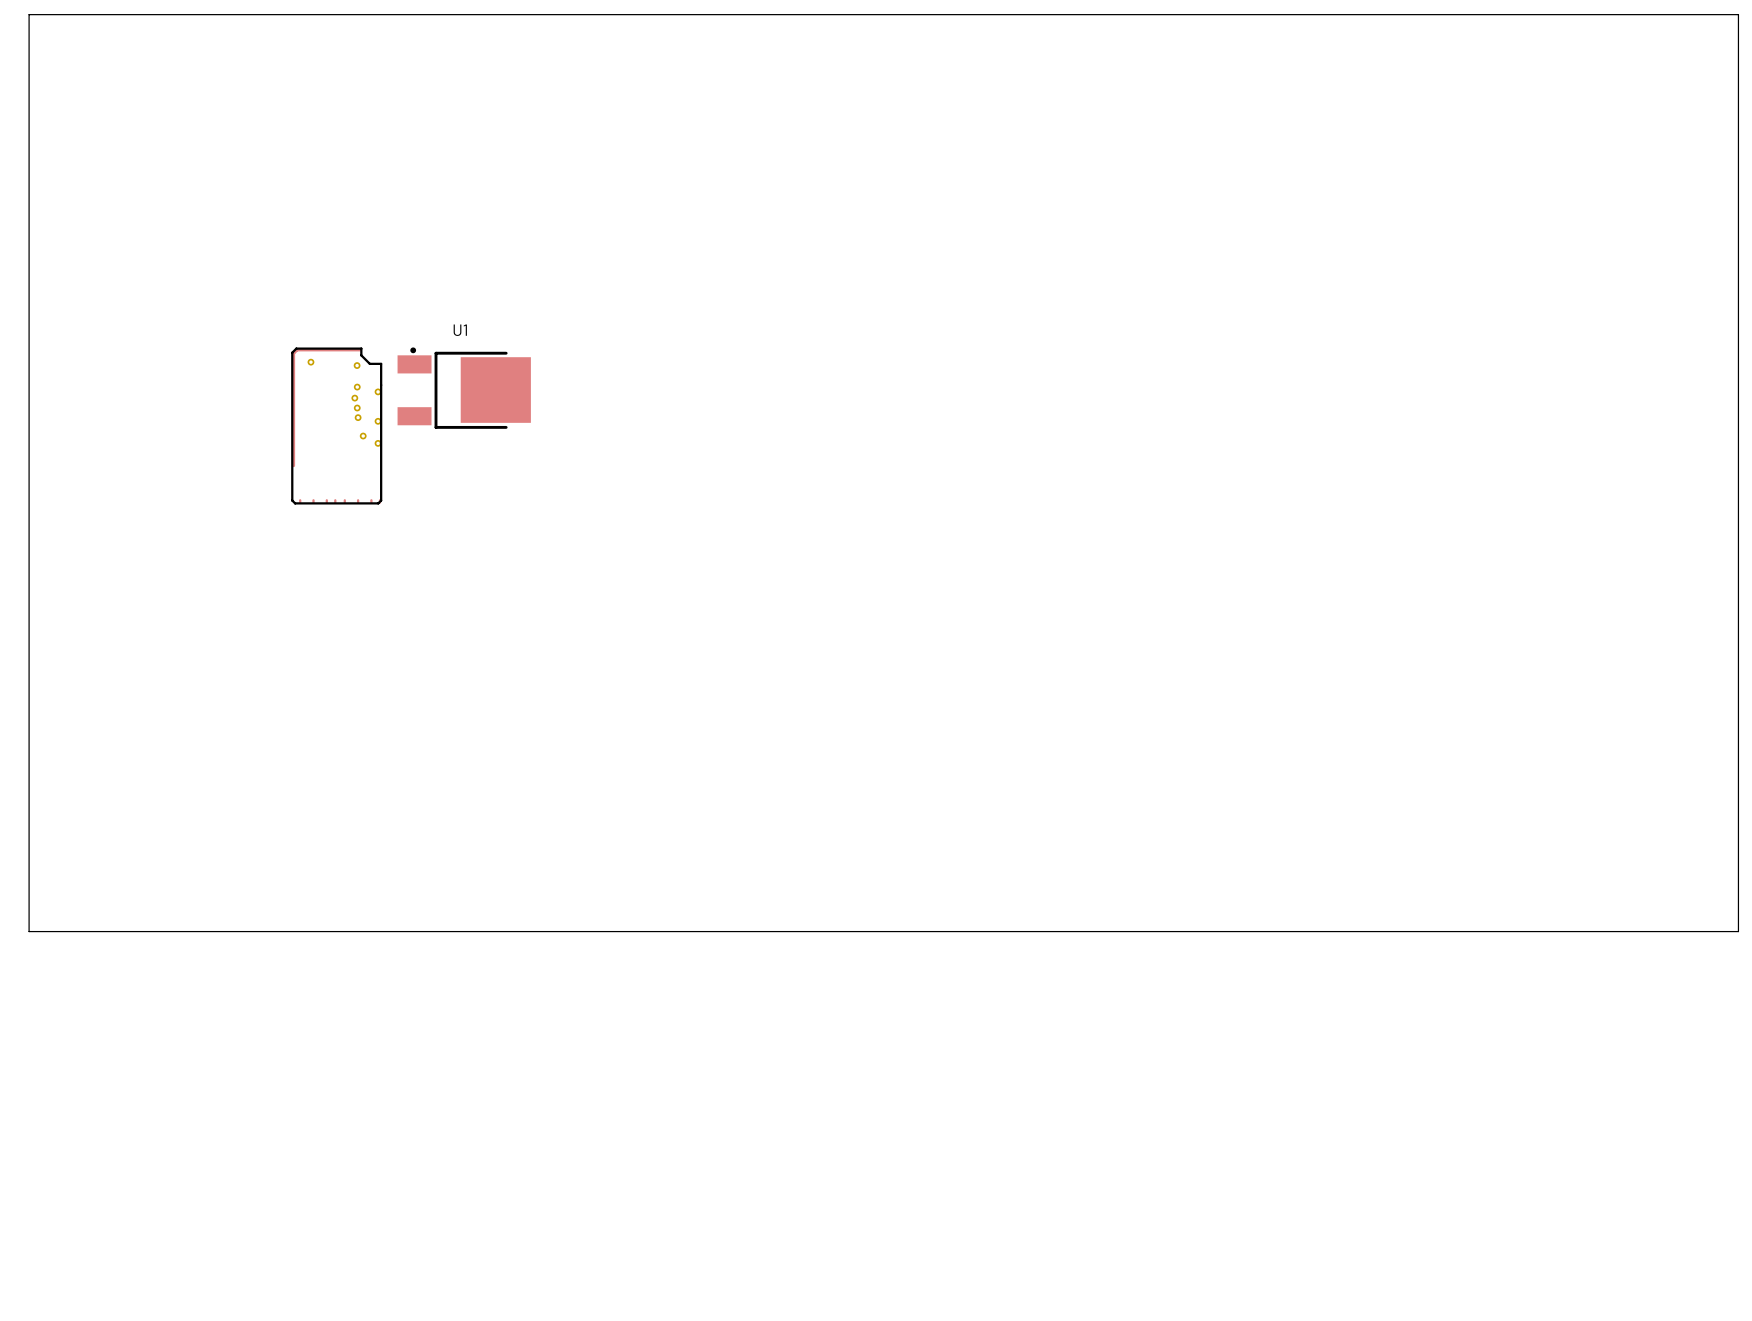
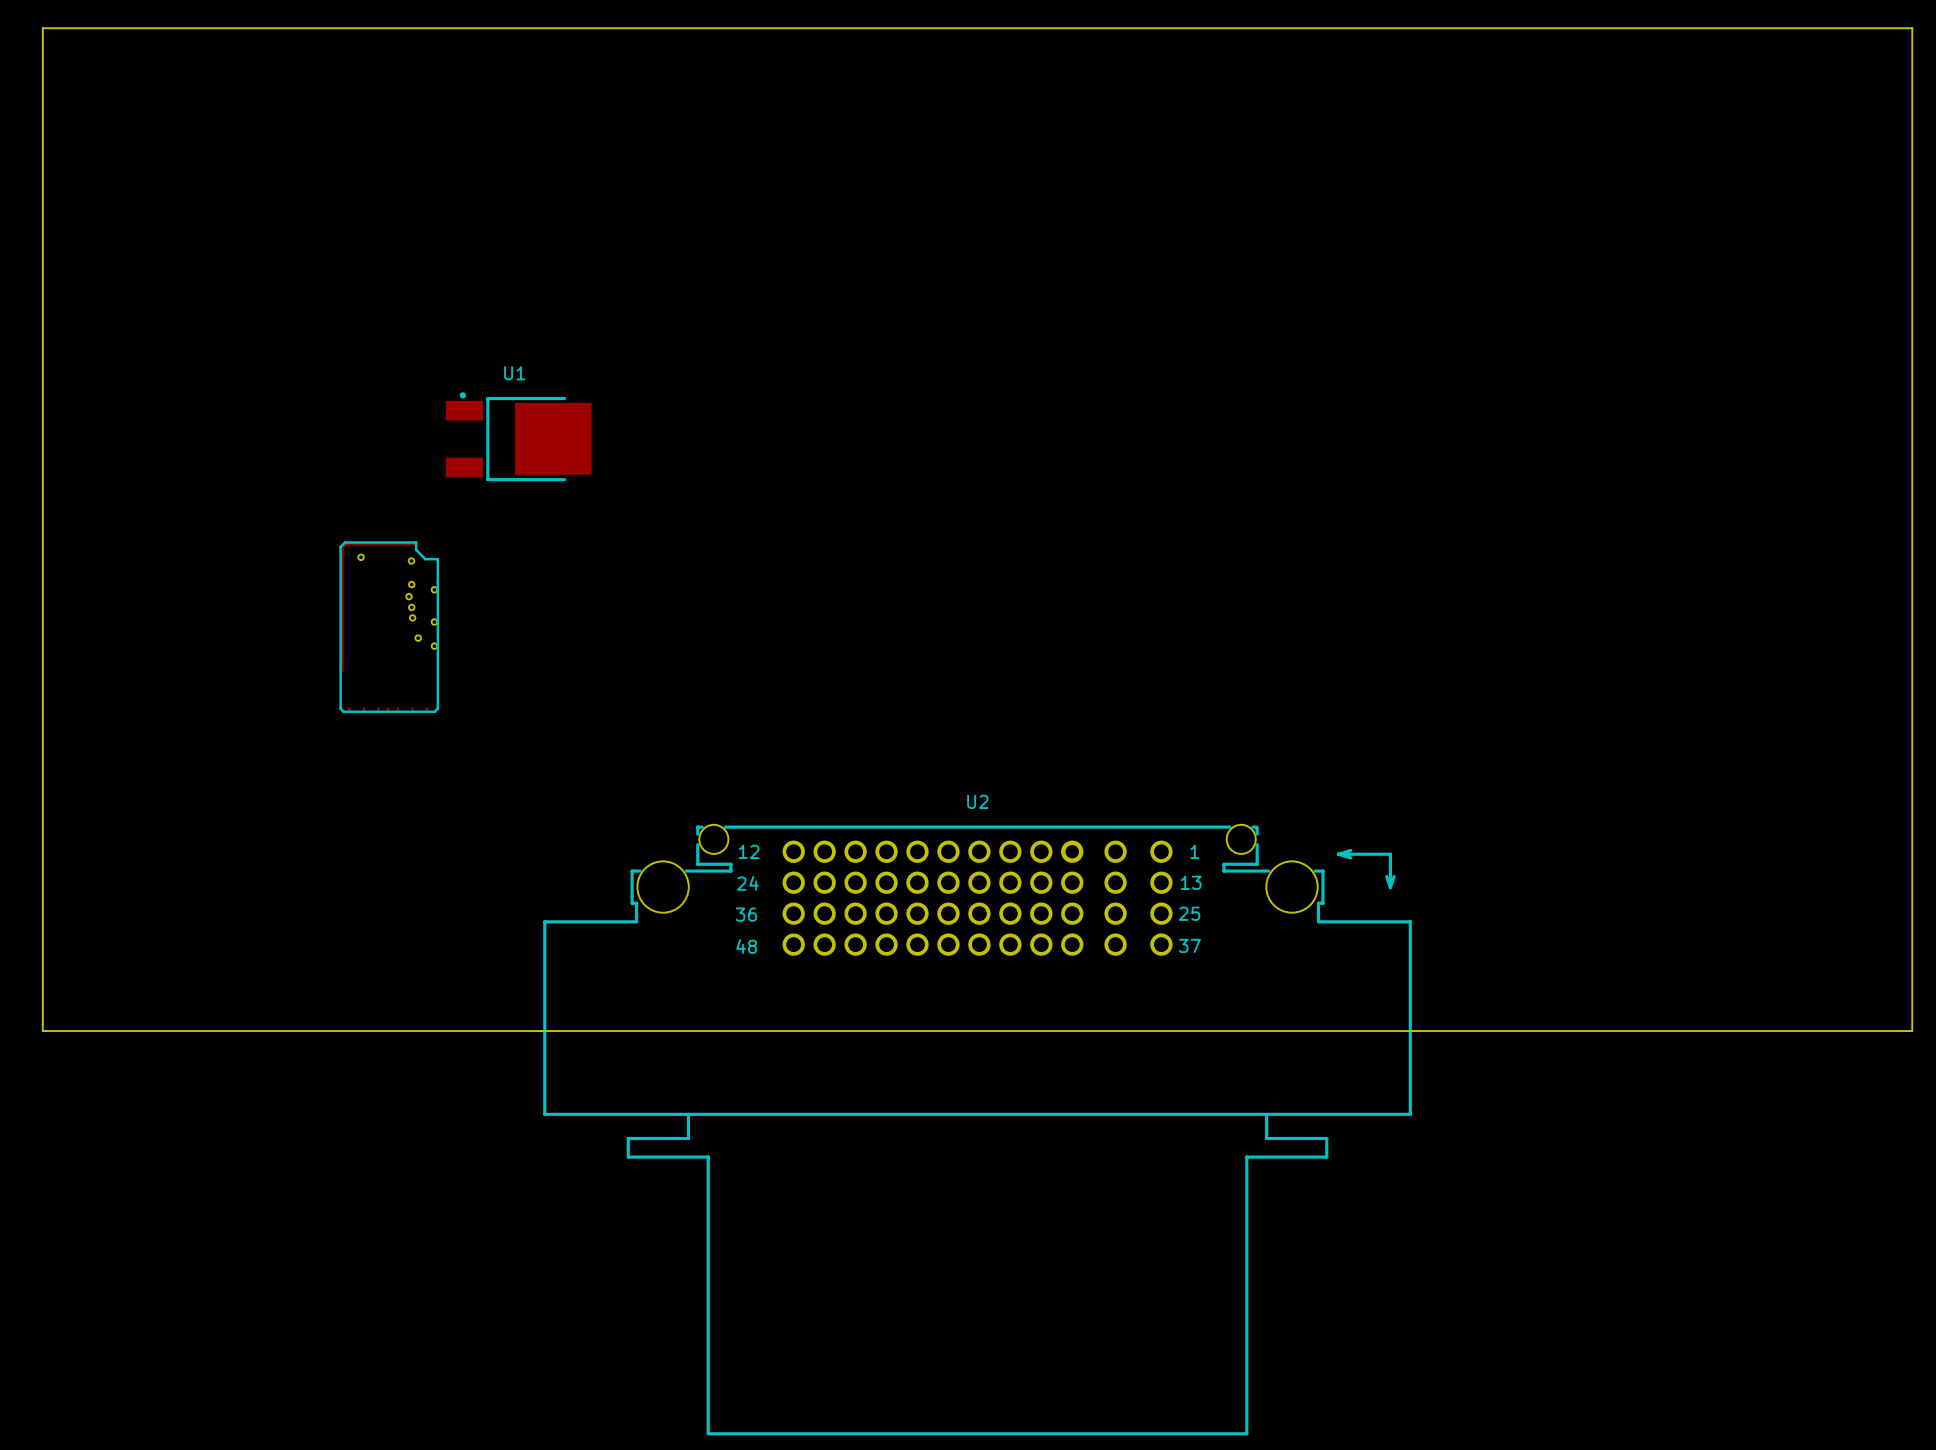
part position: (336, 426) -> (389, 627)
U2: none -> (977, 1130)

